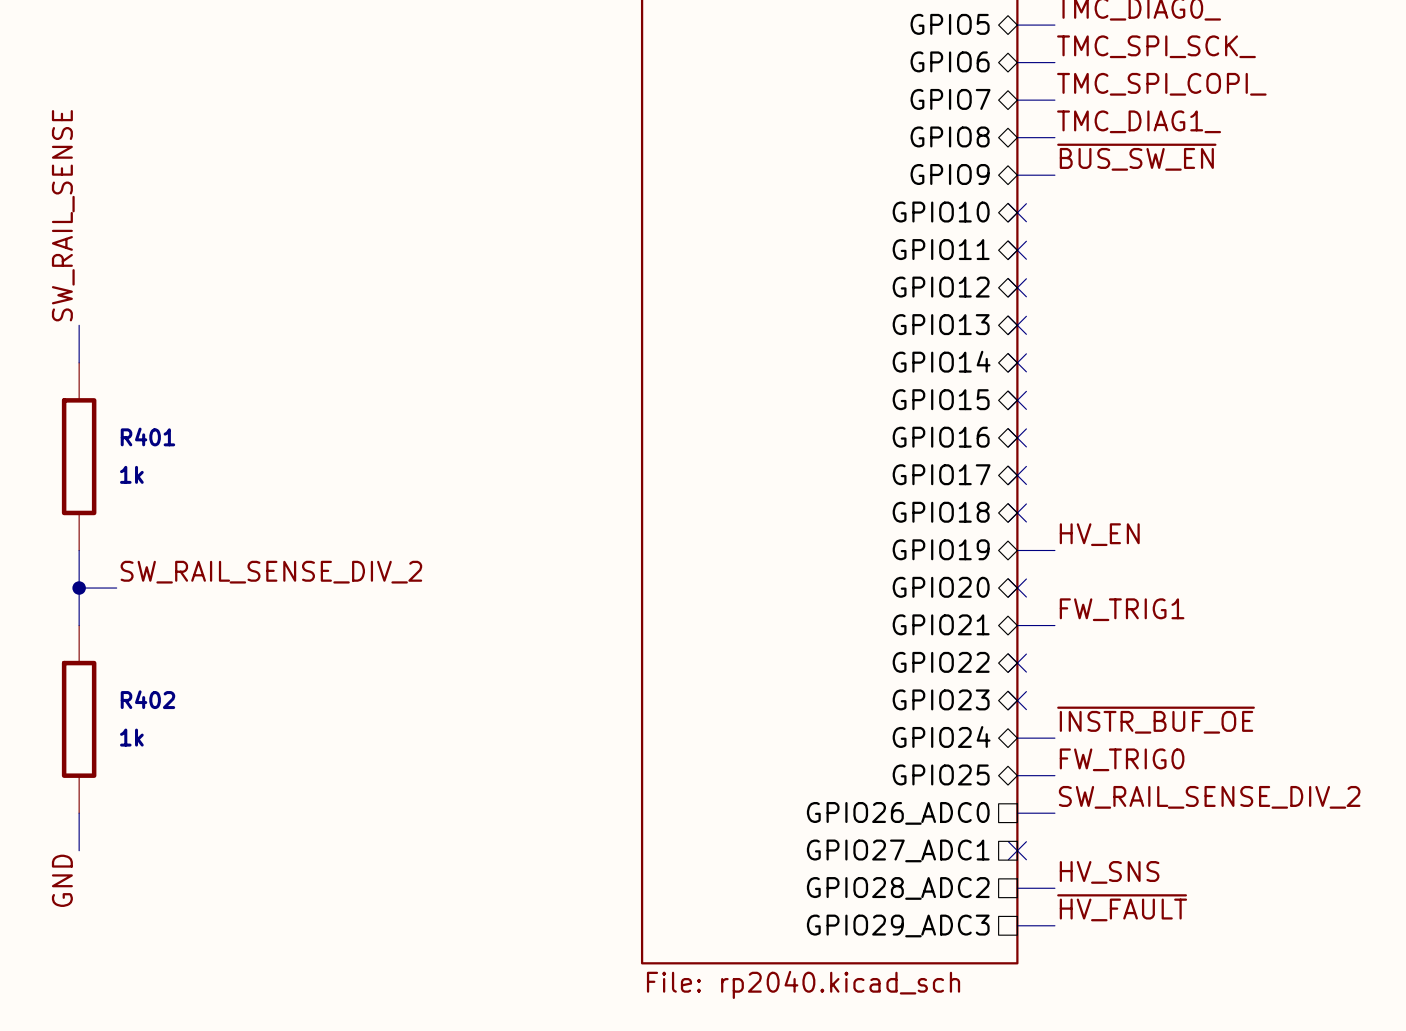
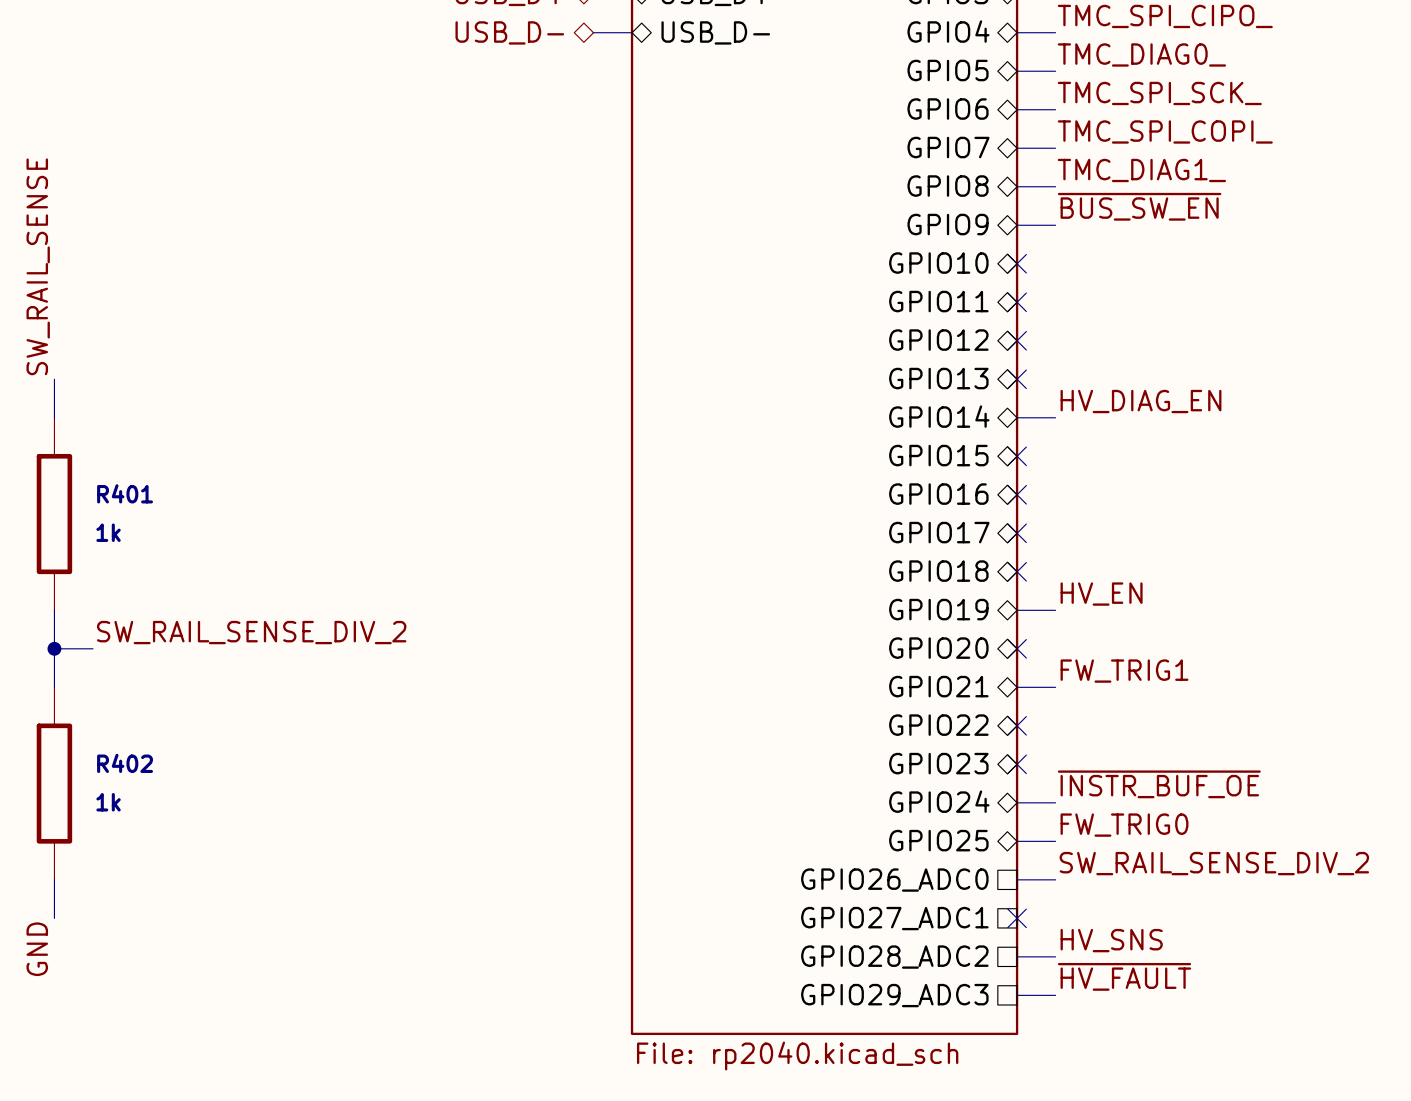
label: none -> HV_DIAG_EN (1140, 401)
wire: none -> (1017, 417) (1055, 417)
no-connect mark: (1017, 362) -> none

